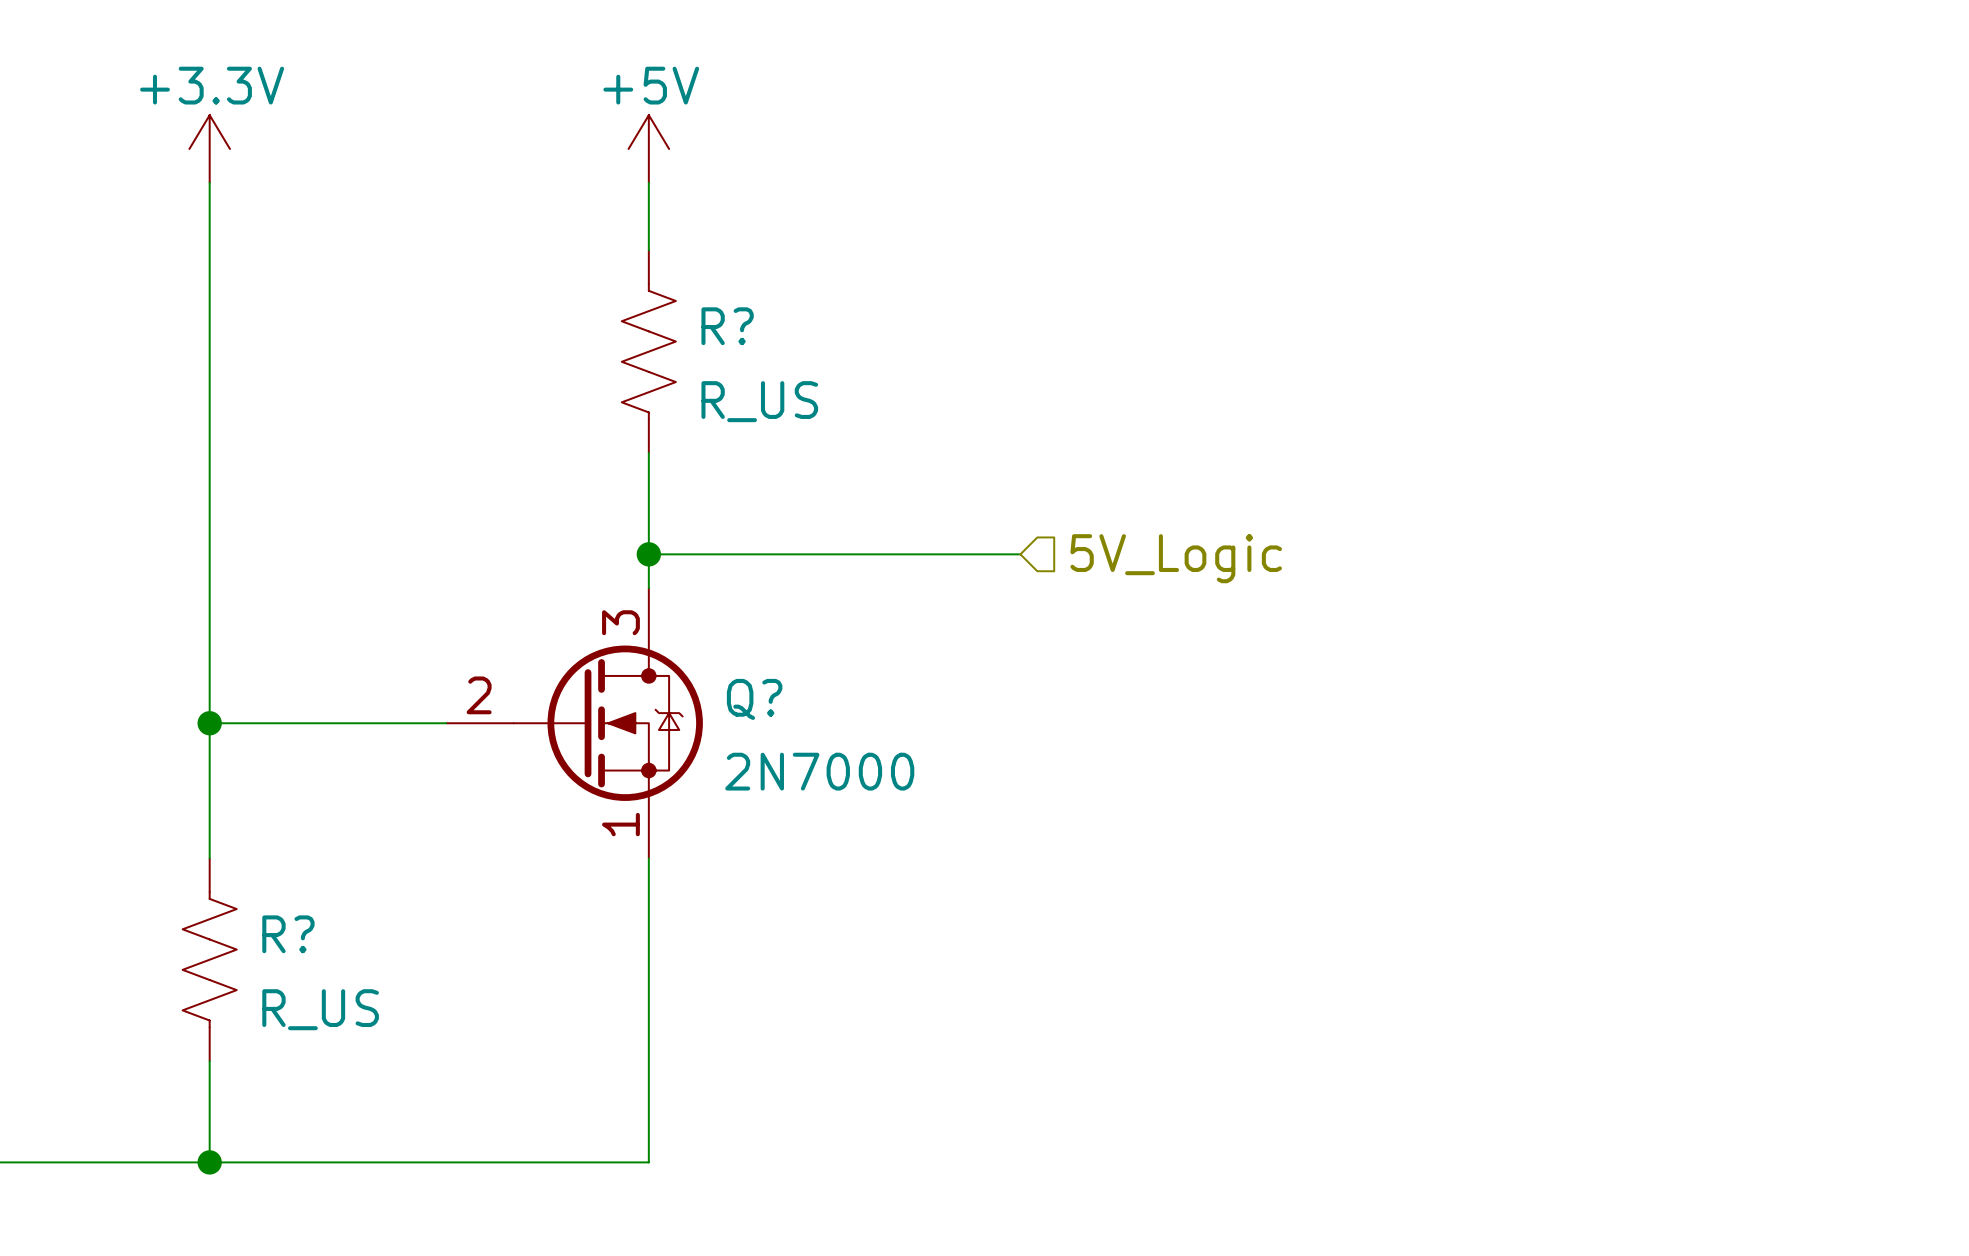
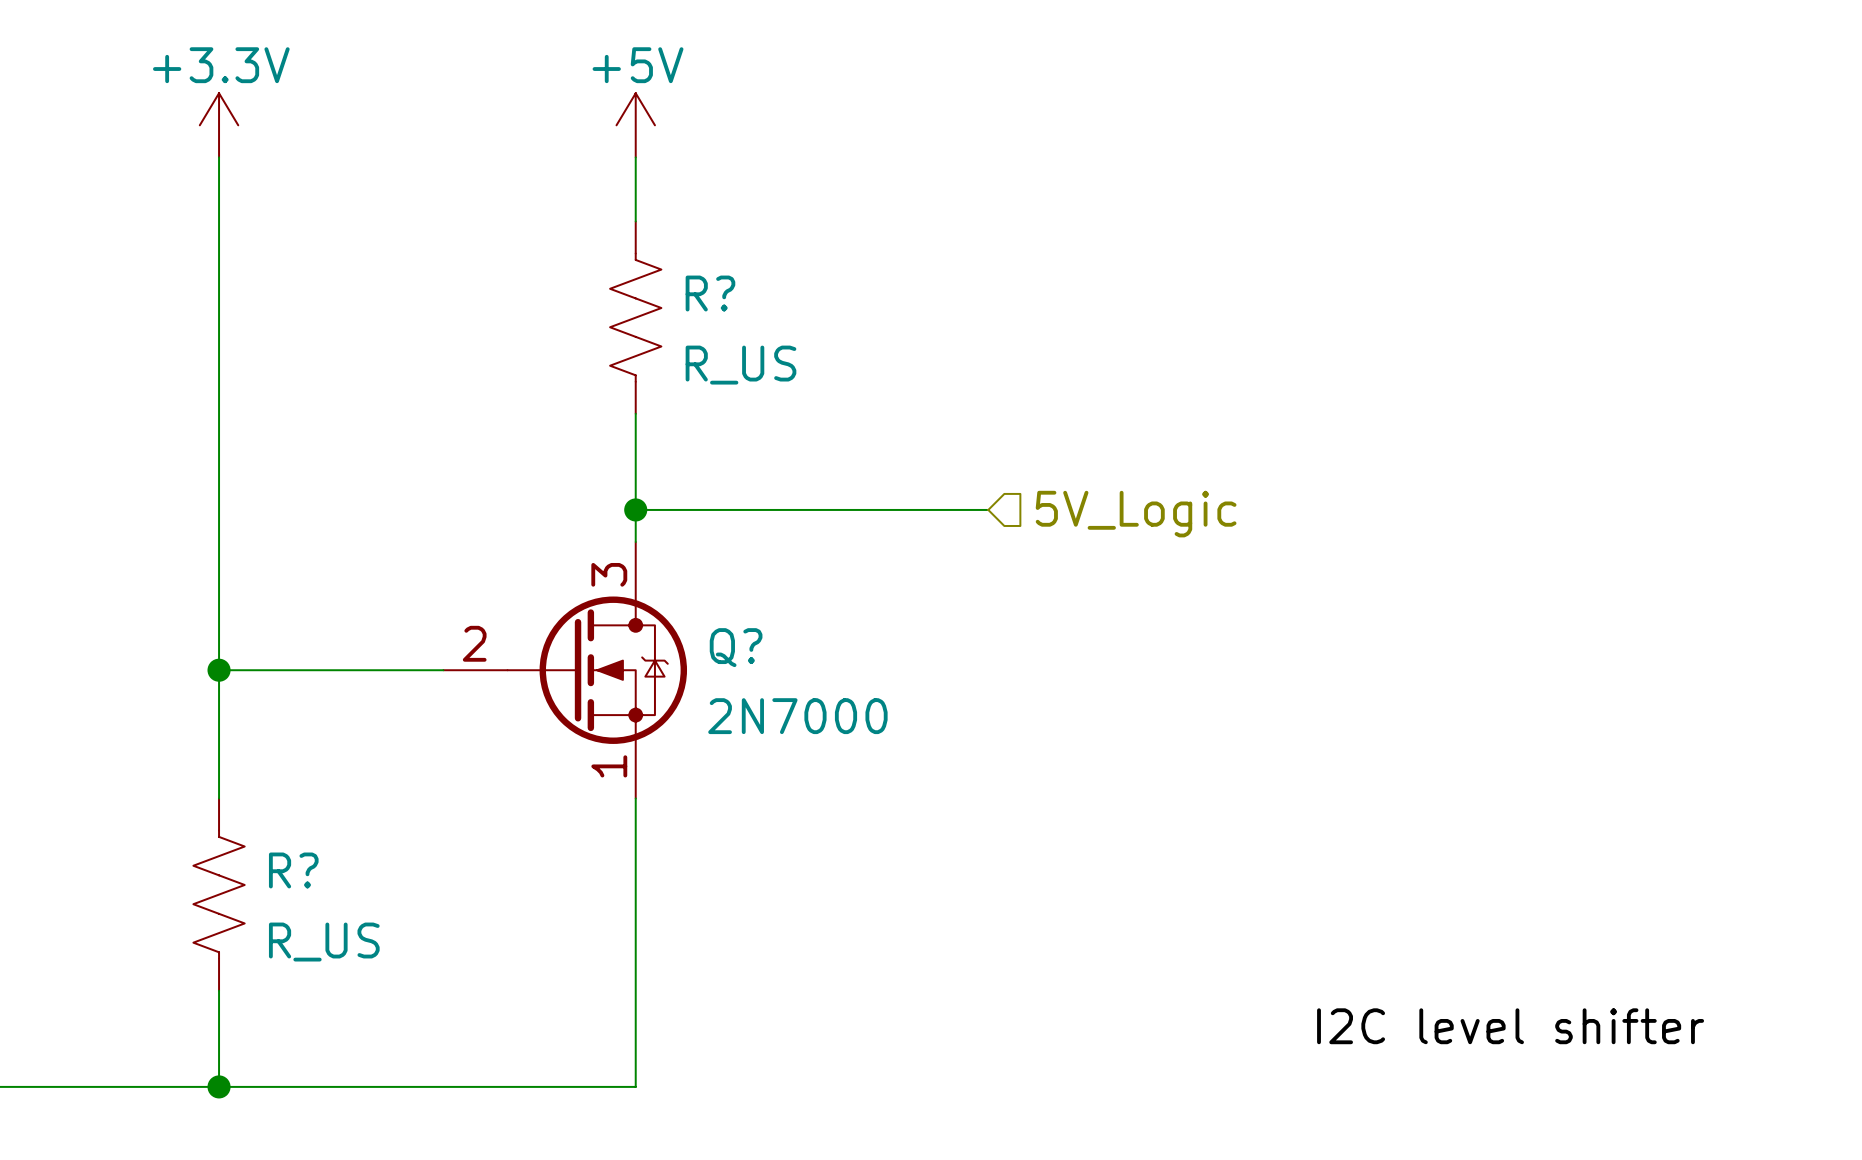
label: none -> I2C level shifter (1510, 1026)

